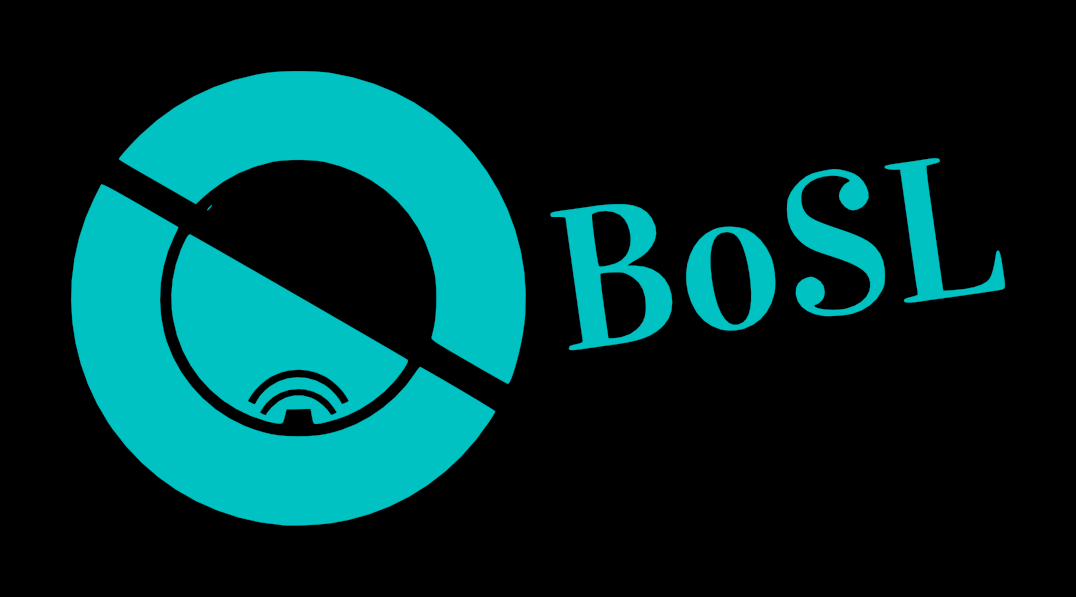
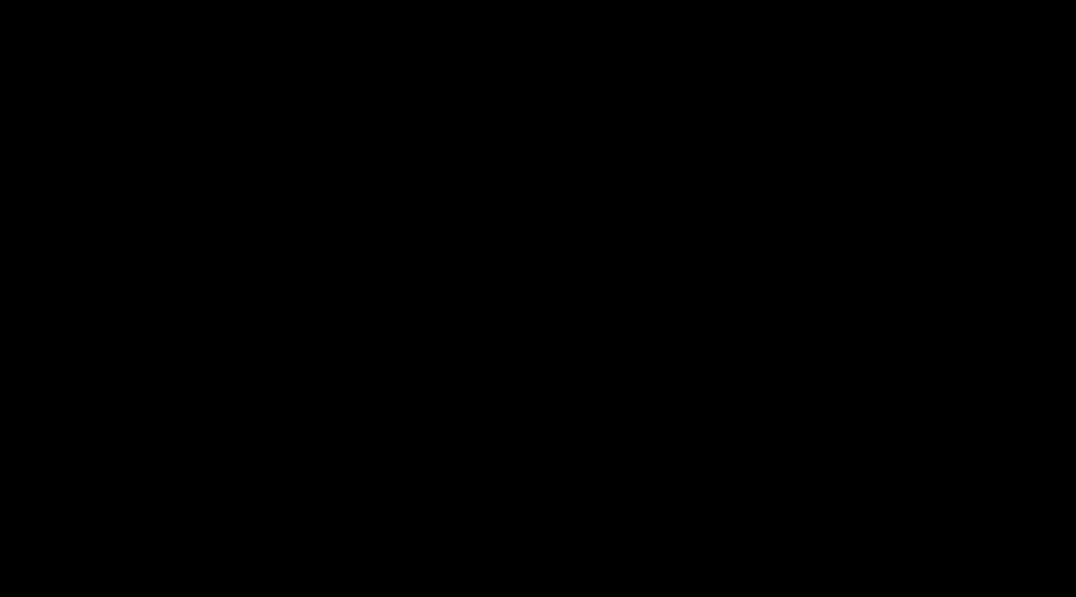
drawing: [71, 71, 1006, 526] -> none

